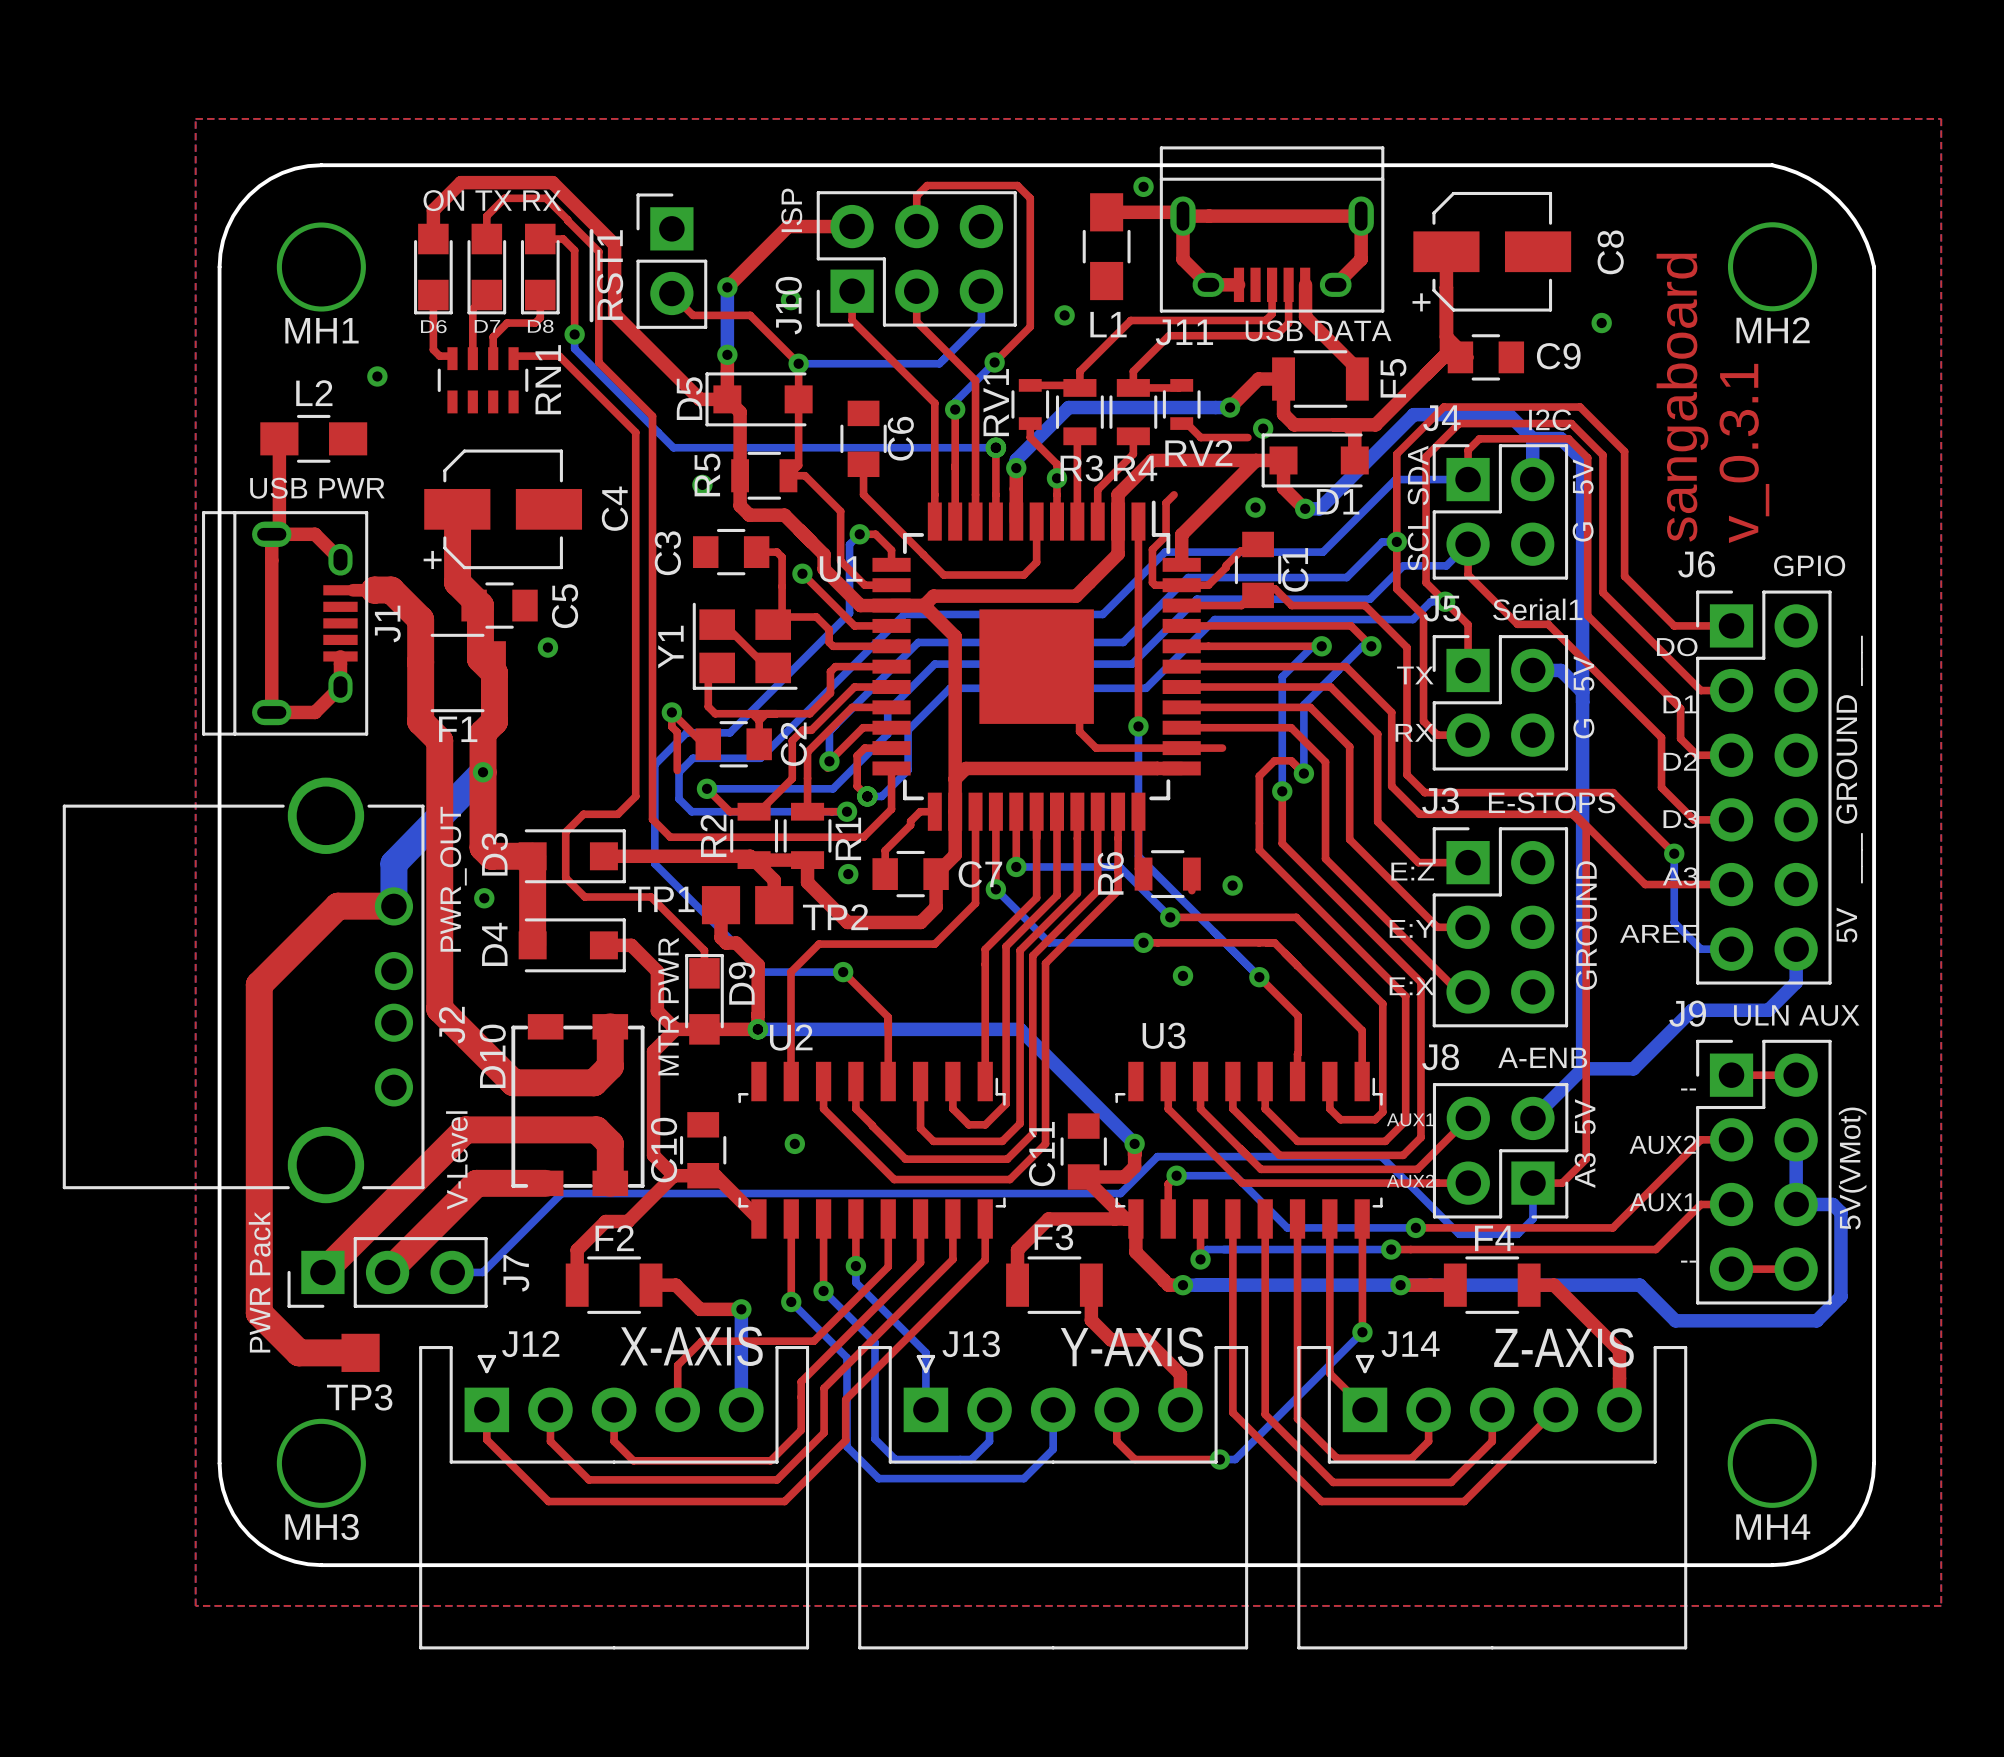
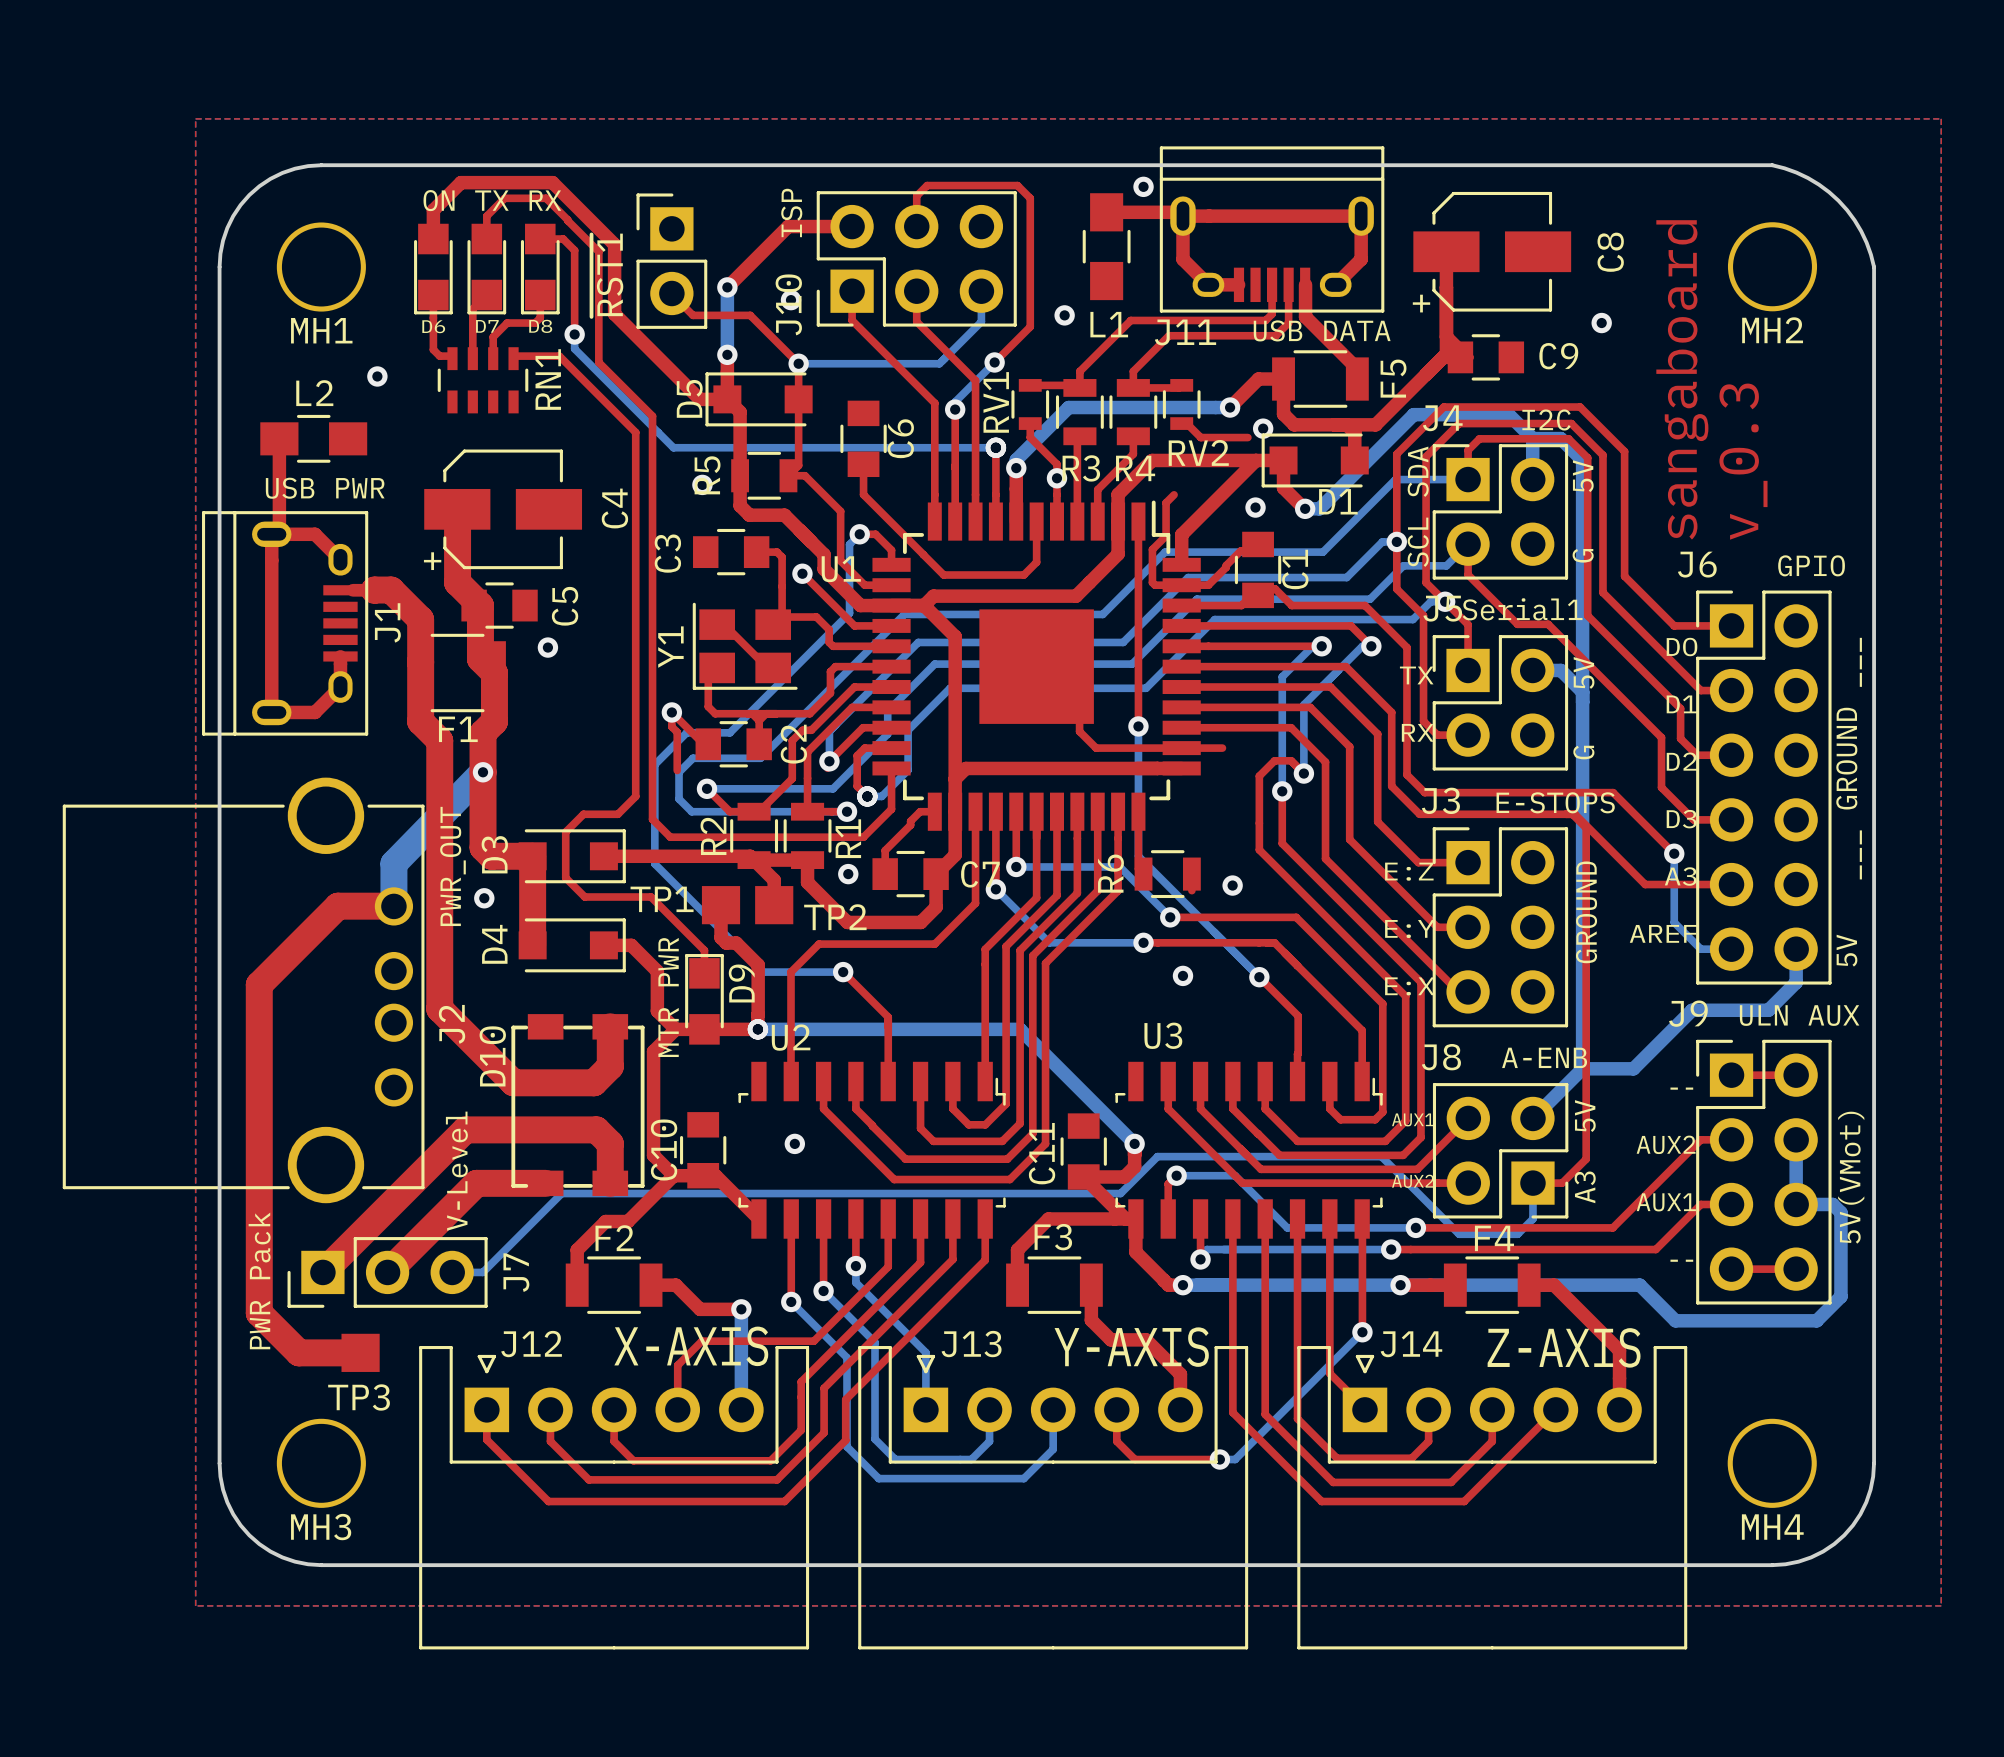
text: v_0.3.1 (1744, 453) -> v_0.3 (1743, 461)

